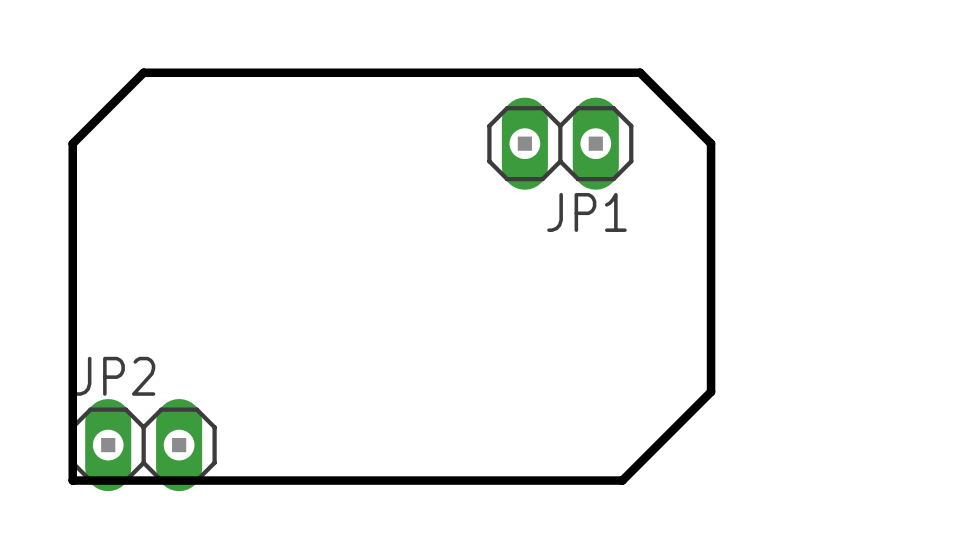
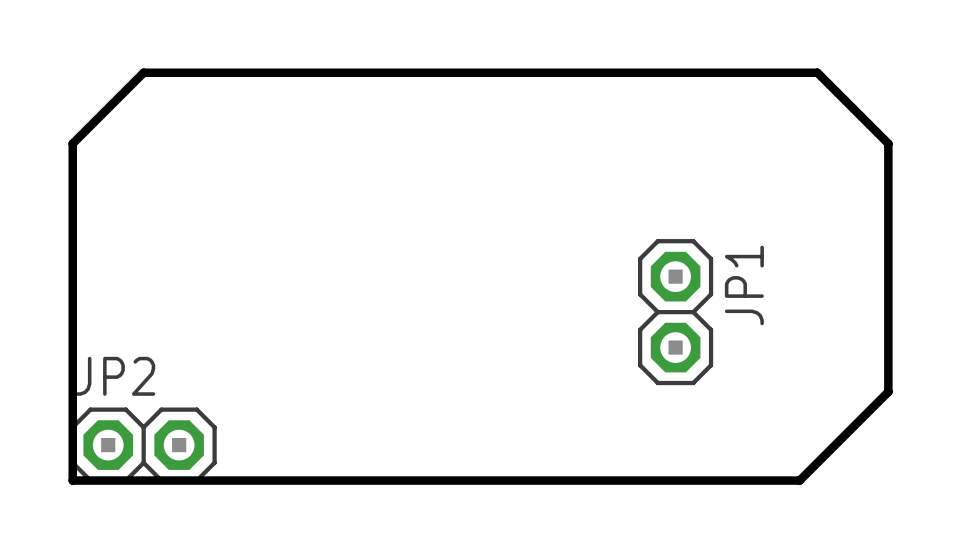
board edge: (640, 72) (711, 143) (711, 391) (622, 480) -> (640, 72) (817, 72) (888, 143) (888, 391) (799, 480) (622, 480)
JP1 footprint: [487, 97, 634, 190] -> [638, 239, 714, 386]
JP1 name position: JP1 (586, 212) -> JP1 (744, 285)
JP2 footprint: [70, 399, 217, 492] -> [70, 407, 217, 483]

